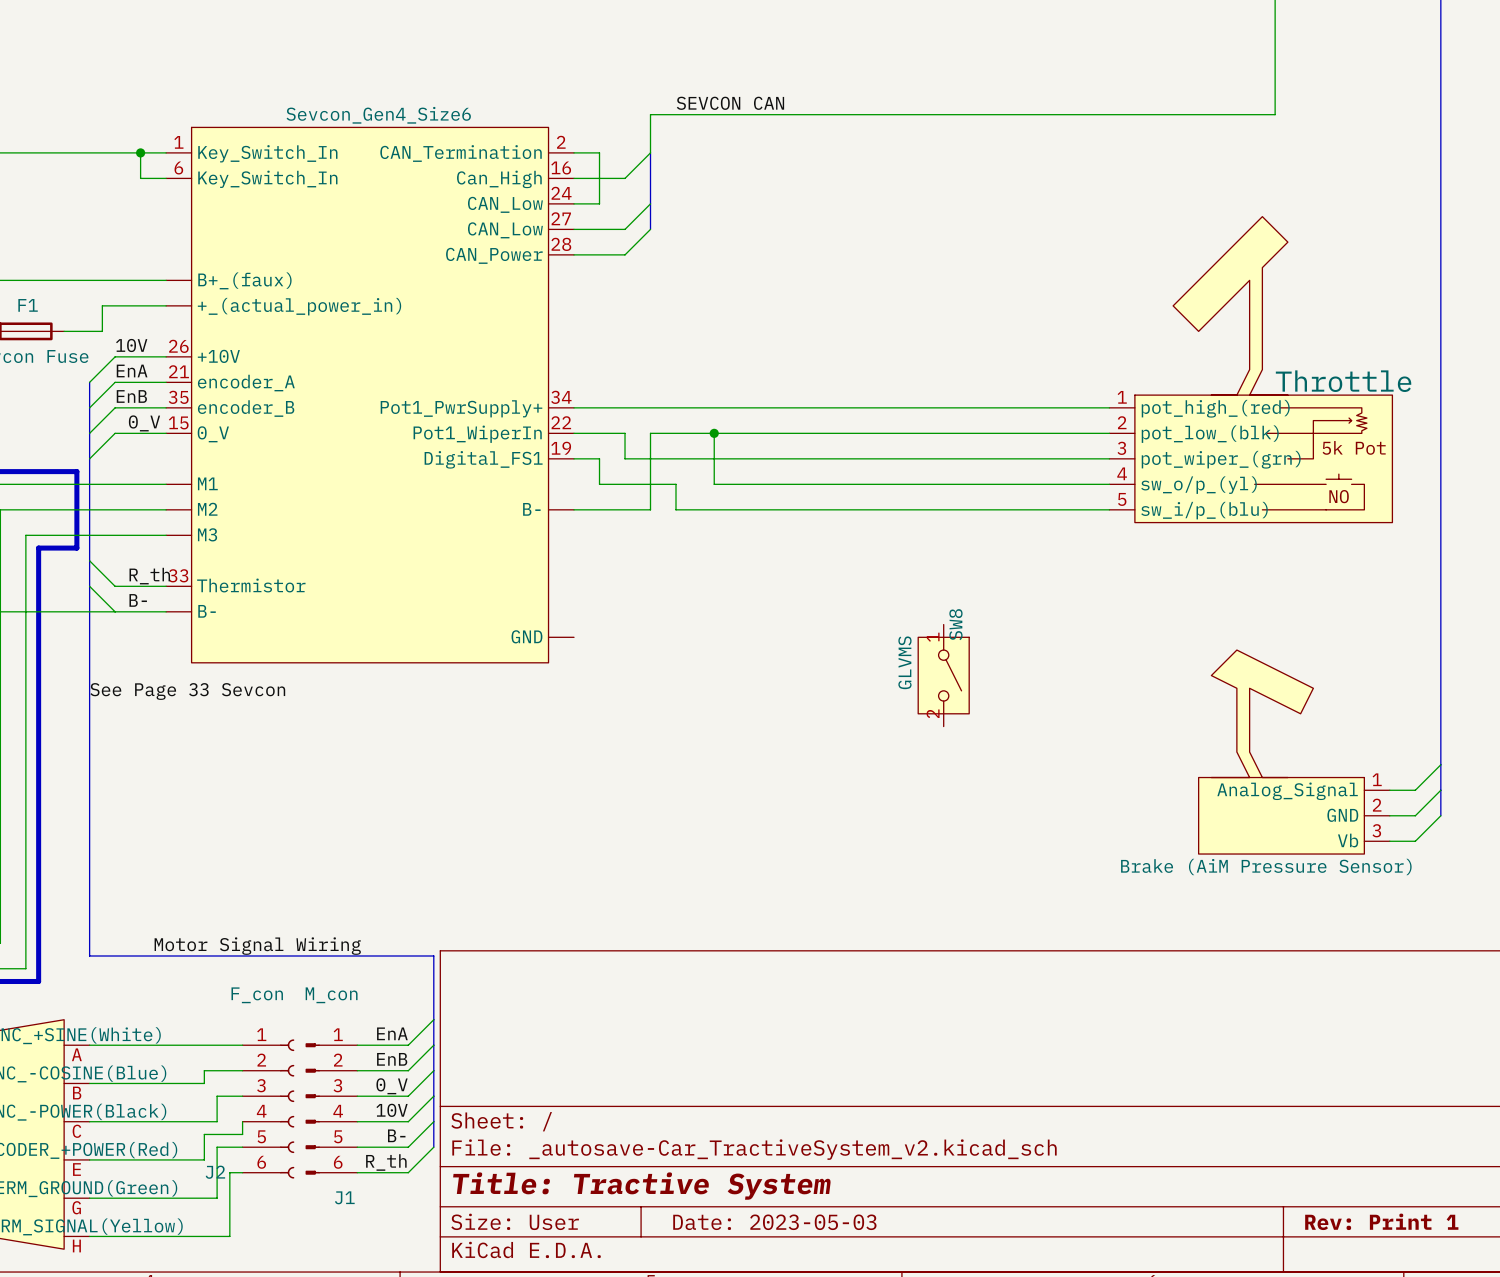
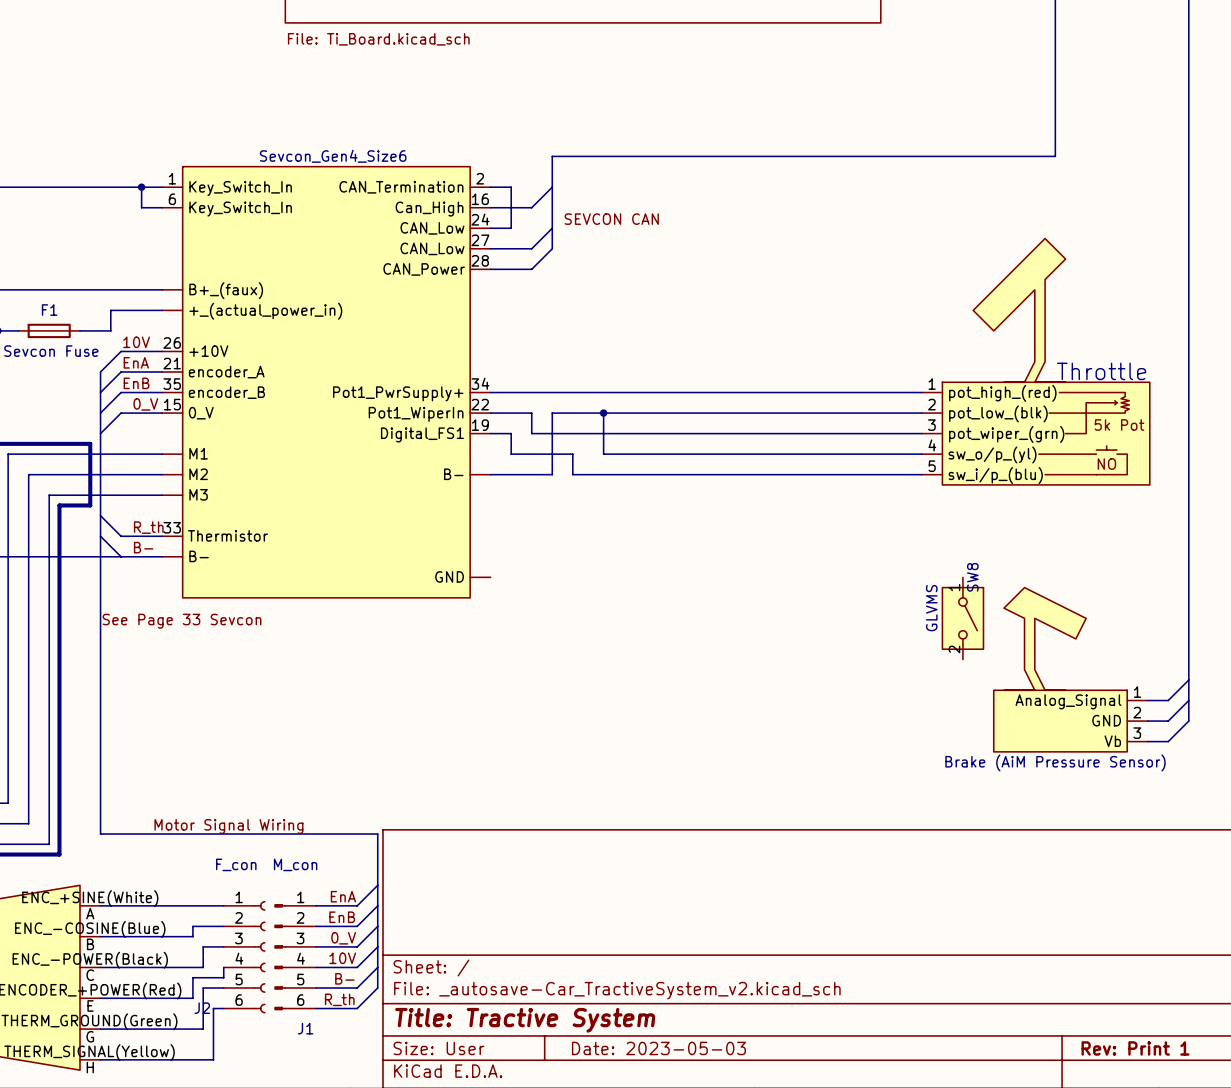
label position: SEVCON CAN (730, 103) -> SEVCON CAN (611, 219)
SW8 position: (943, 675) -> (962, 618)

